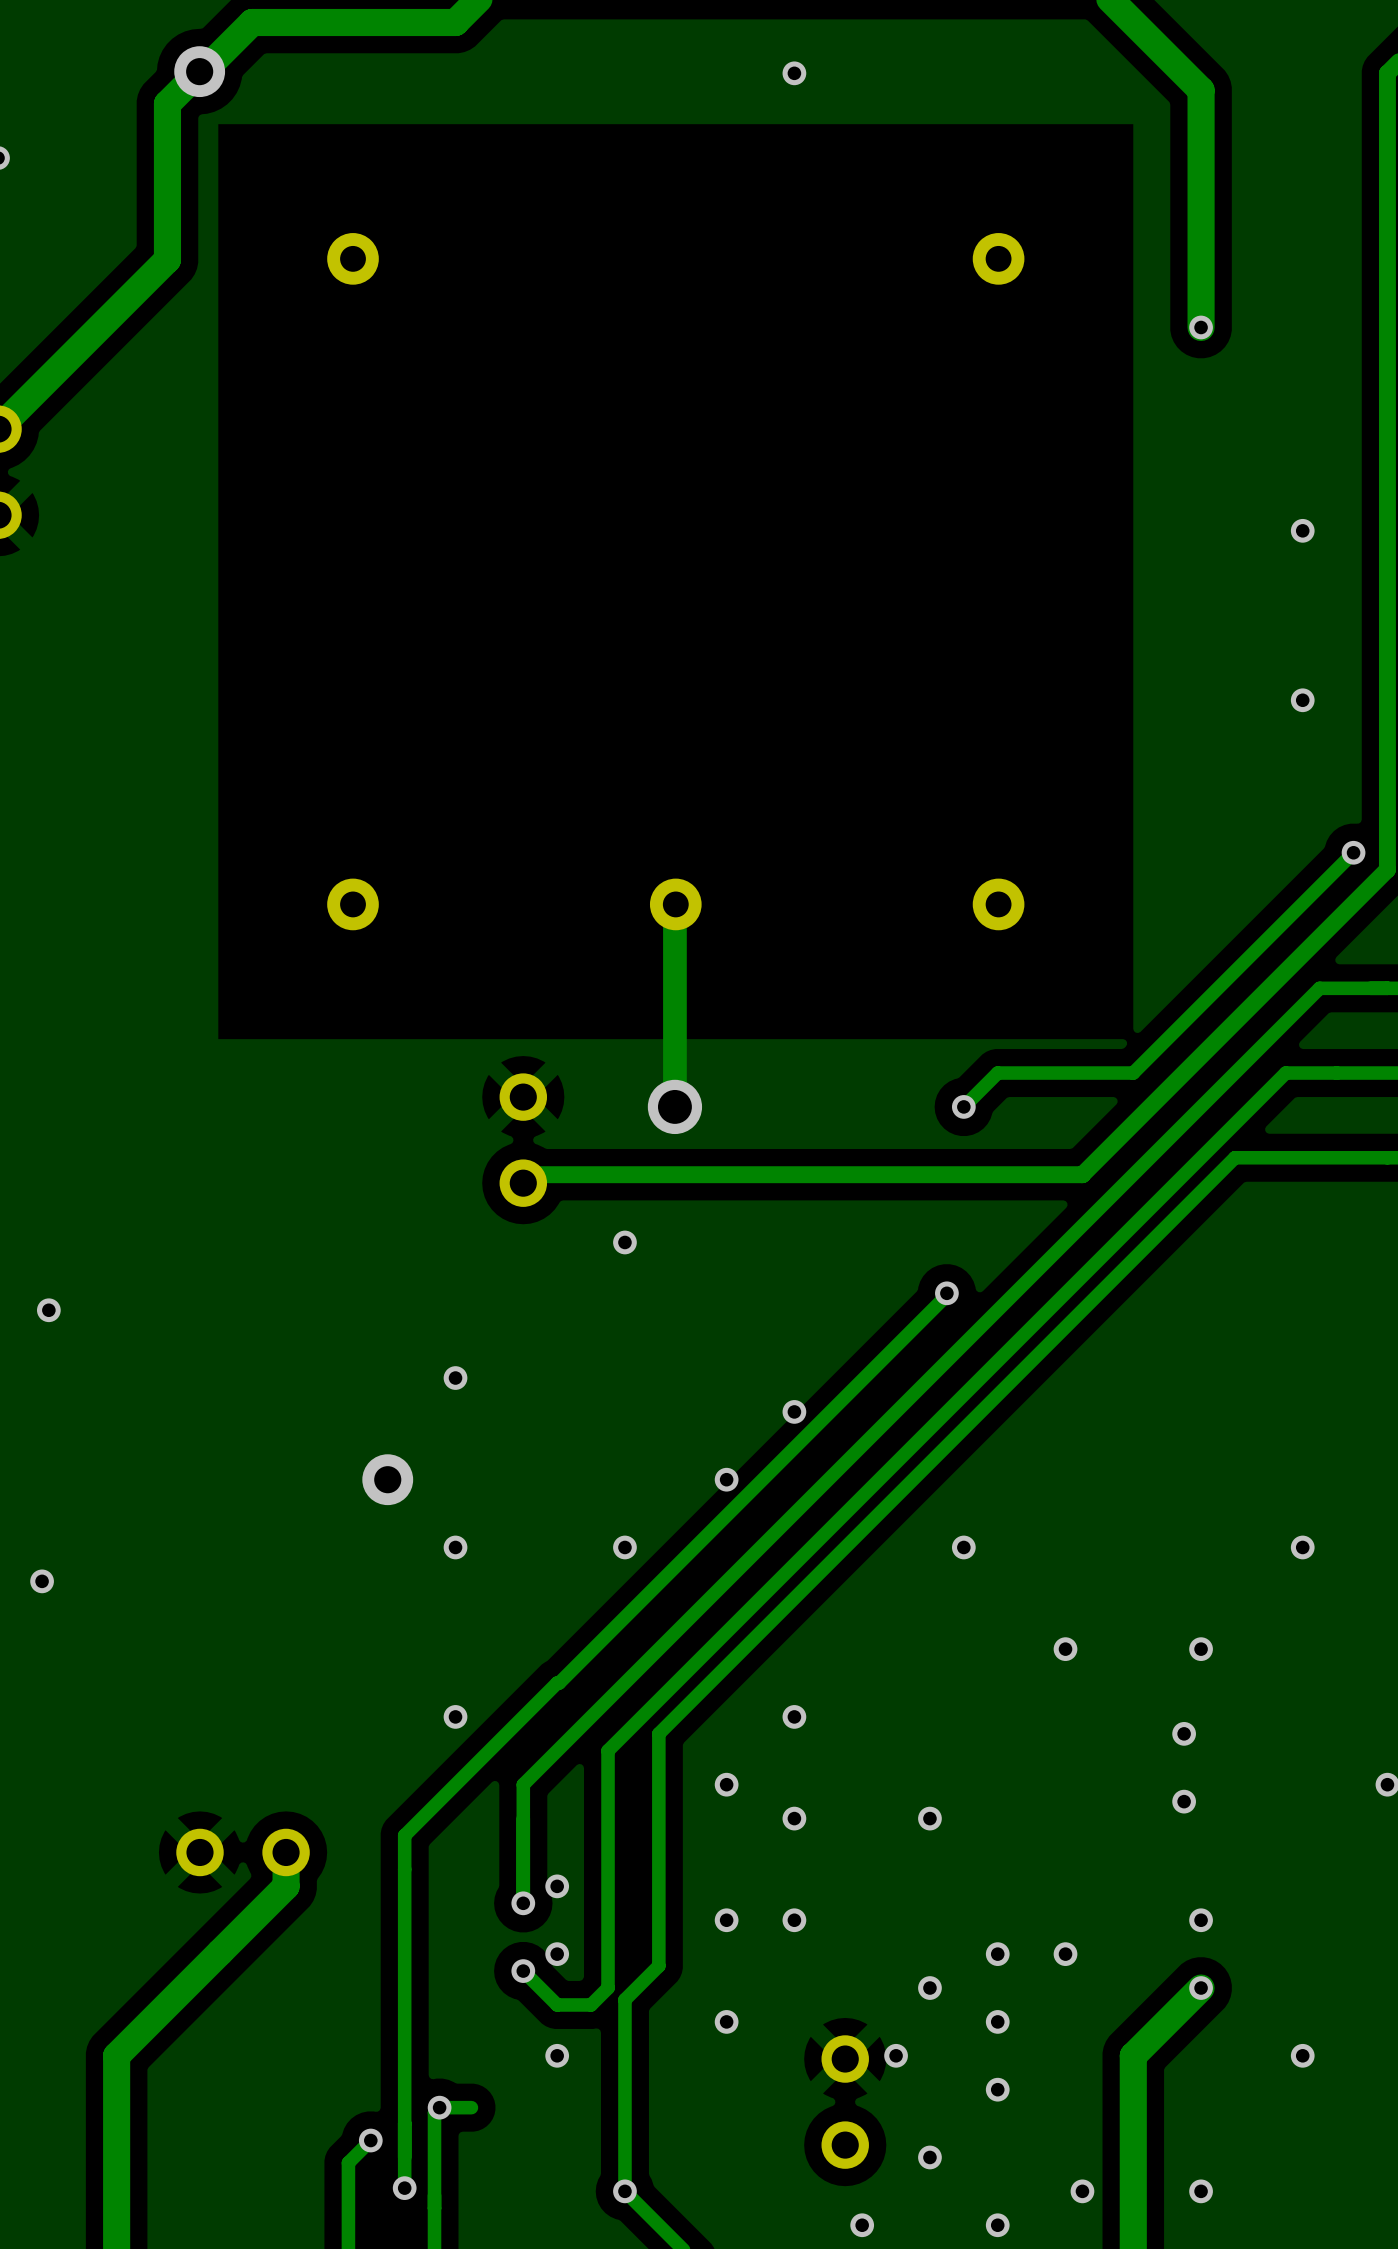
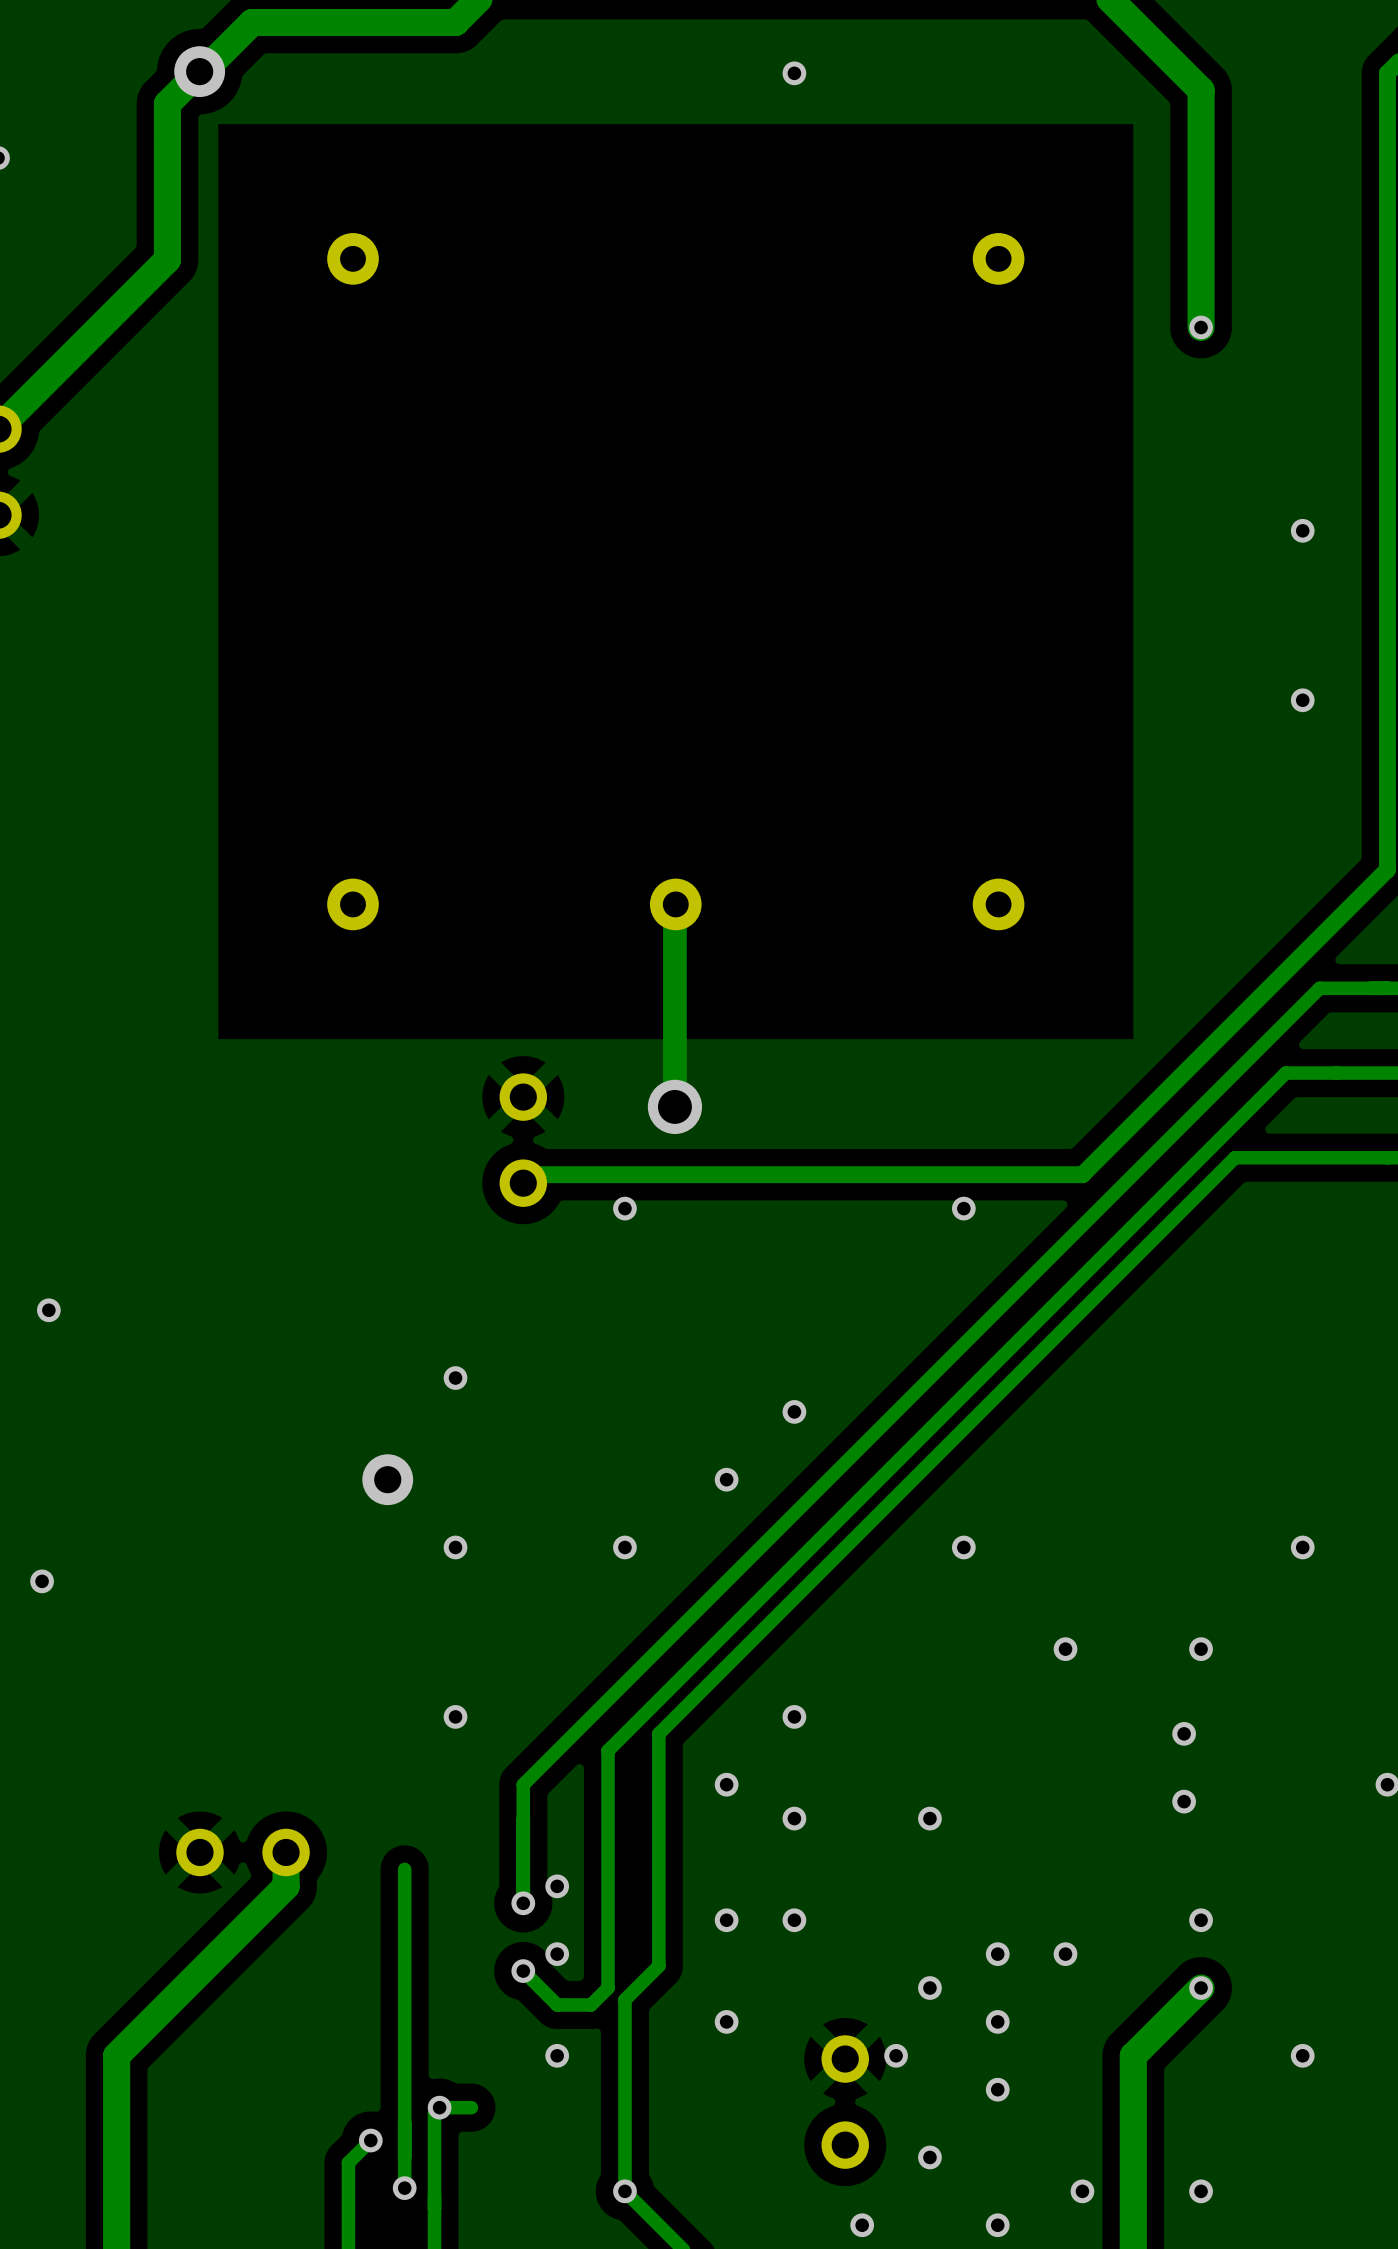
track: (1353, 852) (1133, 1073) (997, 1073) (963, 1106) -> none
via: (1353, 852) -> none
via: (963, 1106) -> none
via: none -> (963, 1208)
via position: (624, 1242) -> (624, 1208)
via: (946, 1293) -> none
track: (946, 1295) (948, 1293) (404, 1835) (404, 1869) -> none

